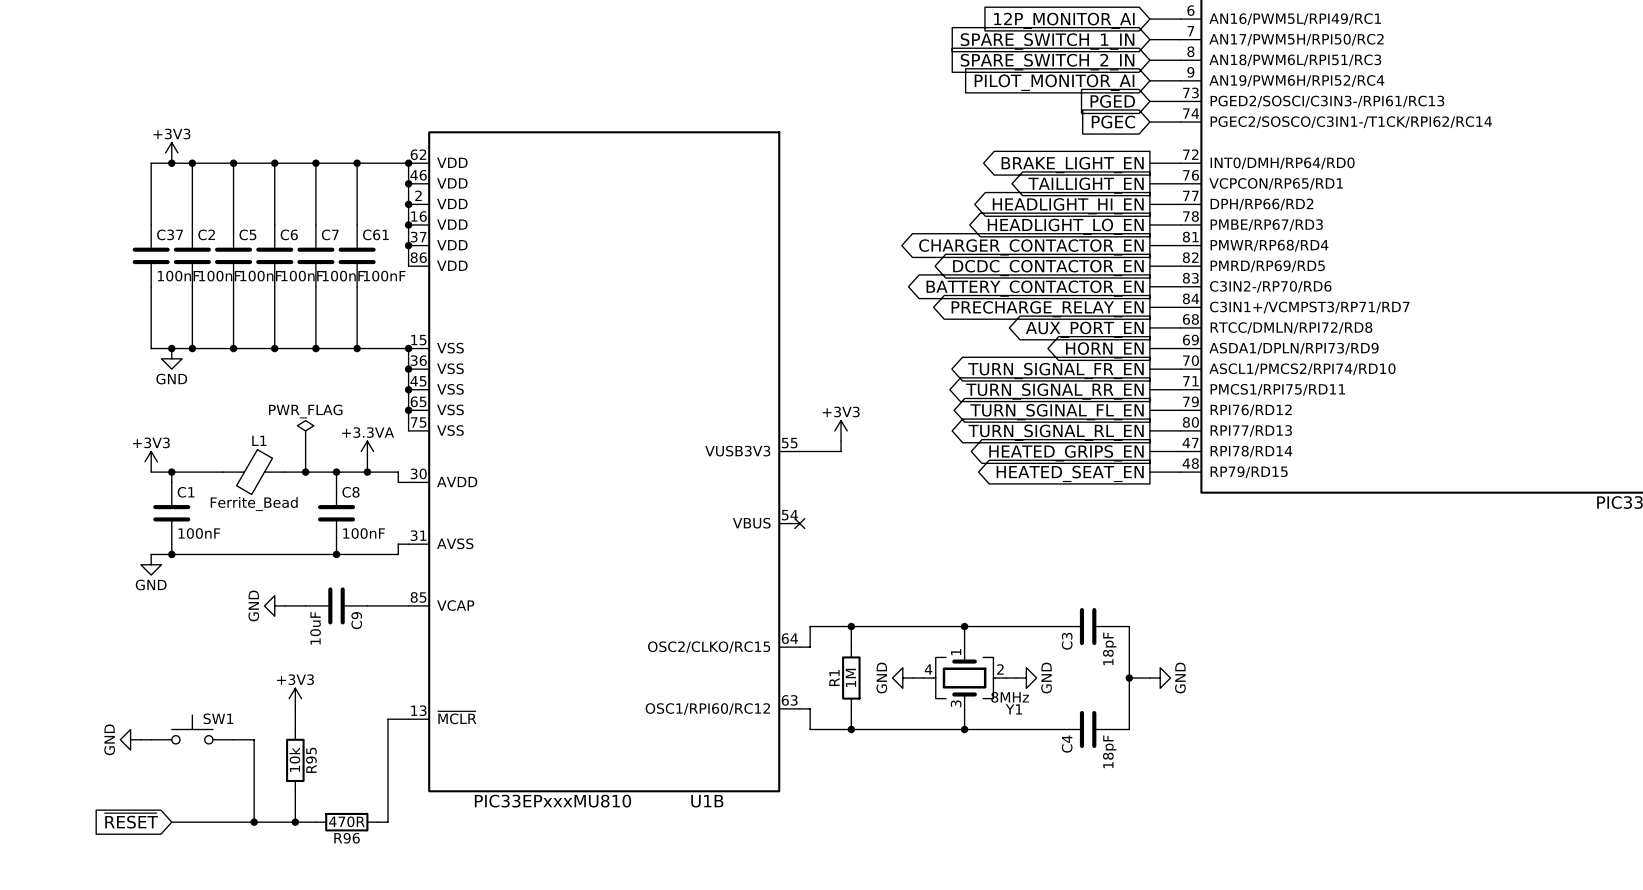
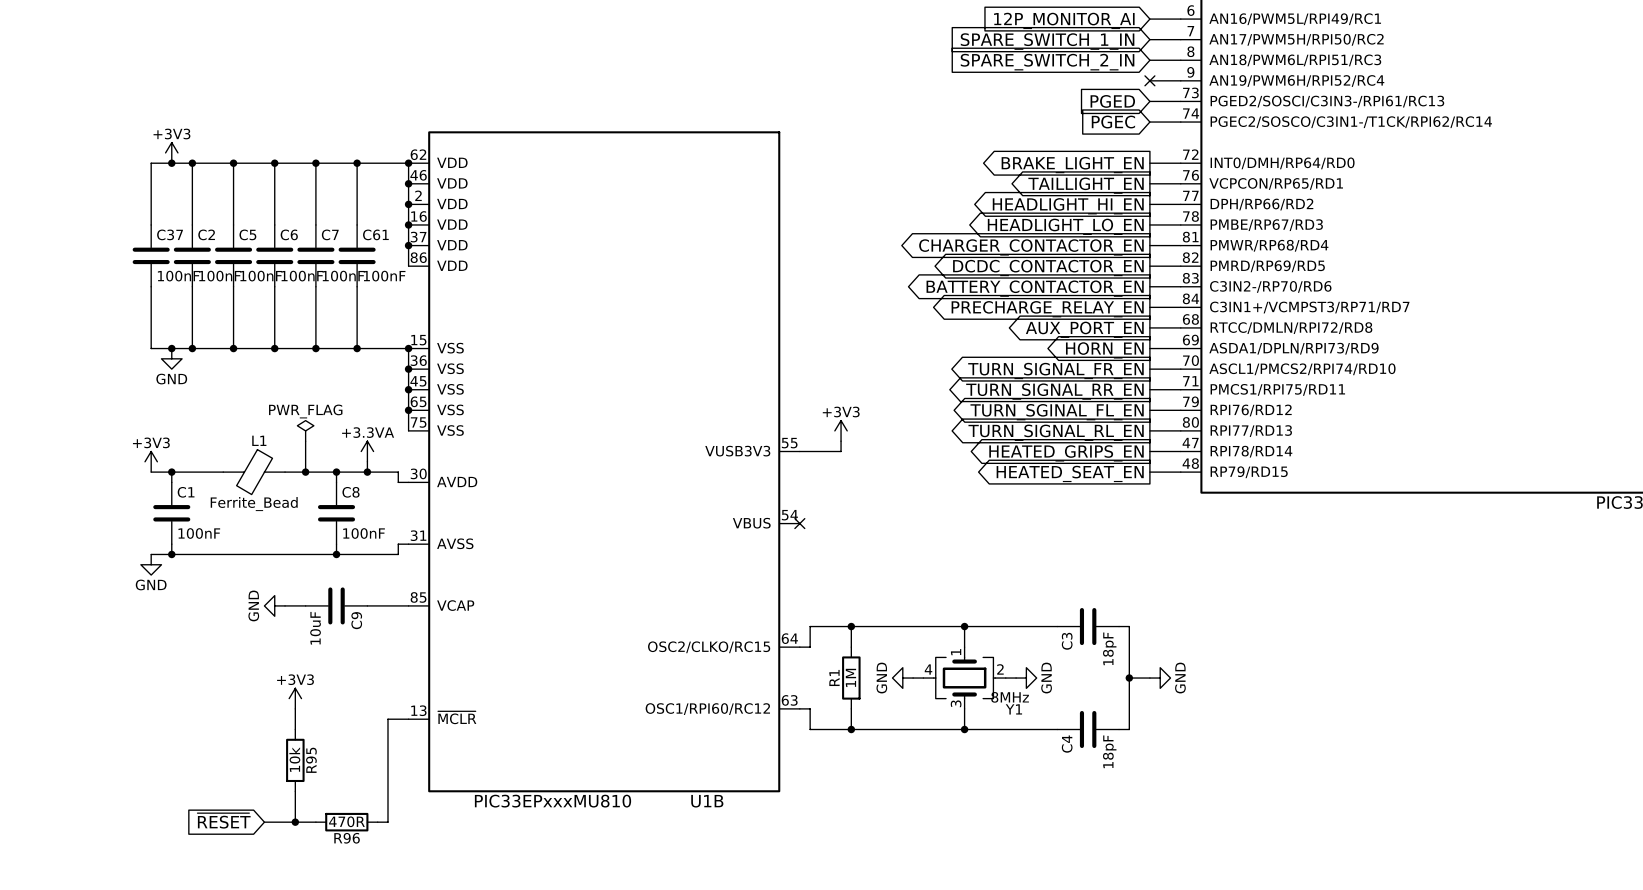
no-connect mark: none -> (1149, 80)
global label: PILOT_MONITOR_AI (1054, 82) -> none
SW1: (192, 729) -> none
power symbol: GND (130, 739) -> none
wire: (140, 739) (151, 739) -> none
wire: (233, 739) (254, 739) (254, 822) -> none
global label position: ~{RESET} (131, 820) -> ~{RESET} (224, 820)
wire: (171, 822) (264, 822) -> none
junction: (254, 822) -> none

